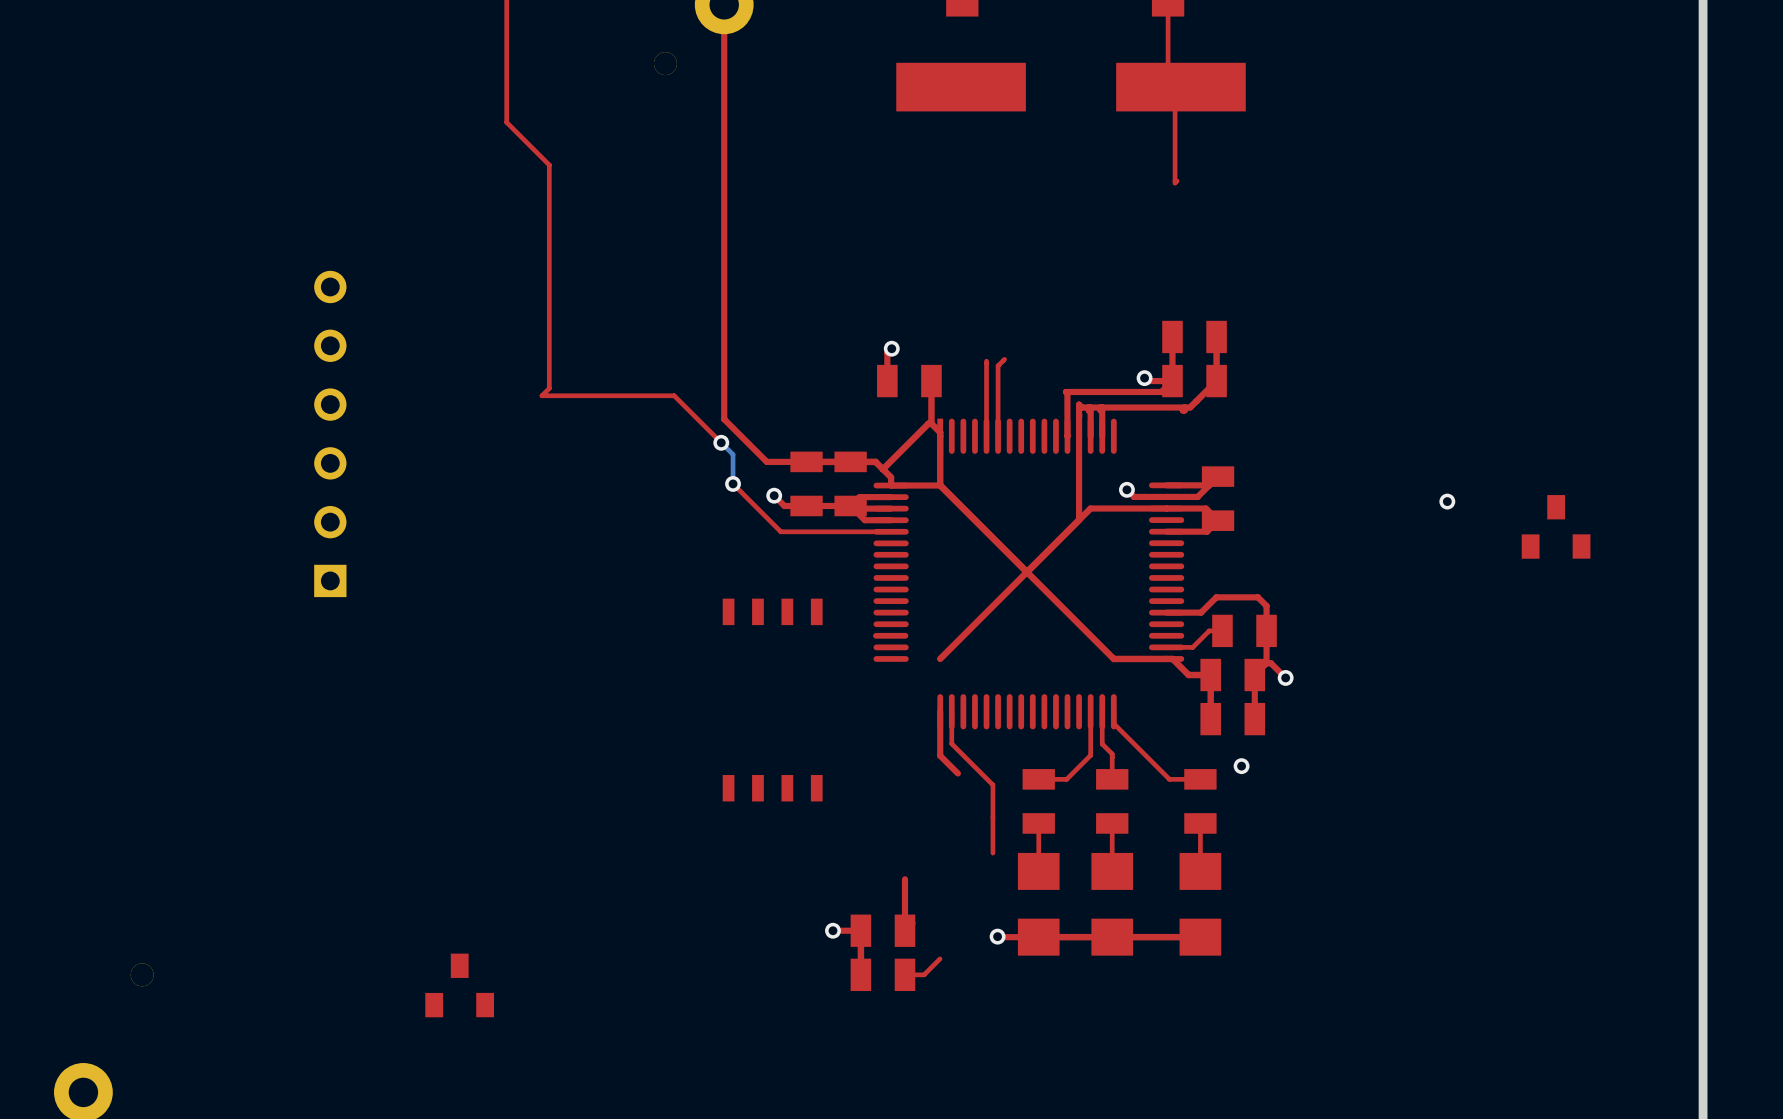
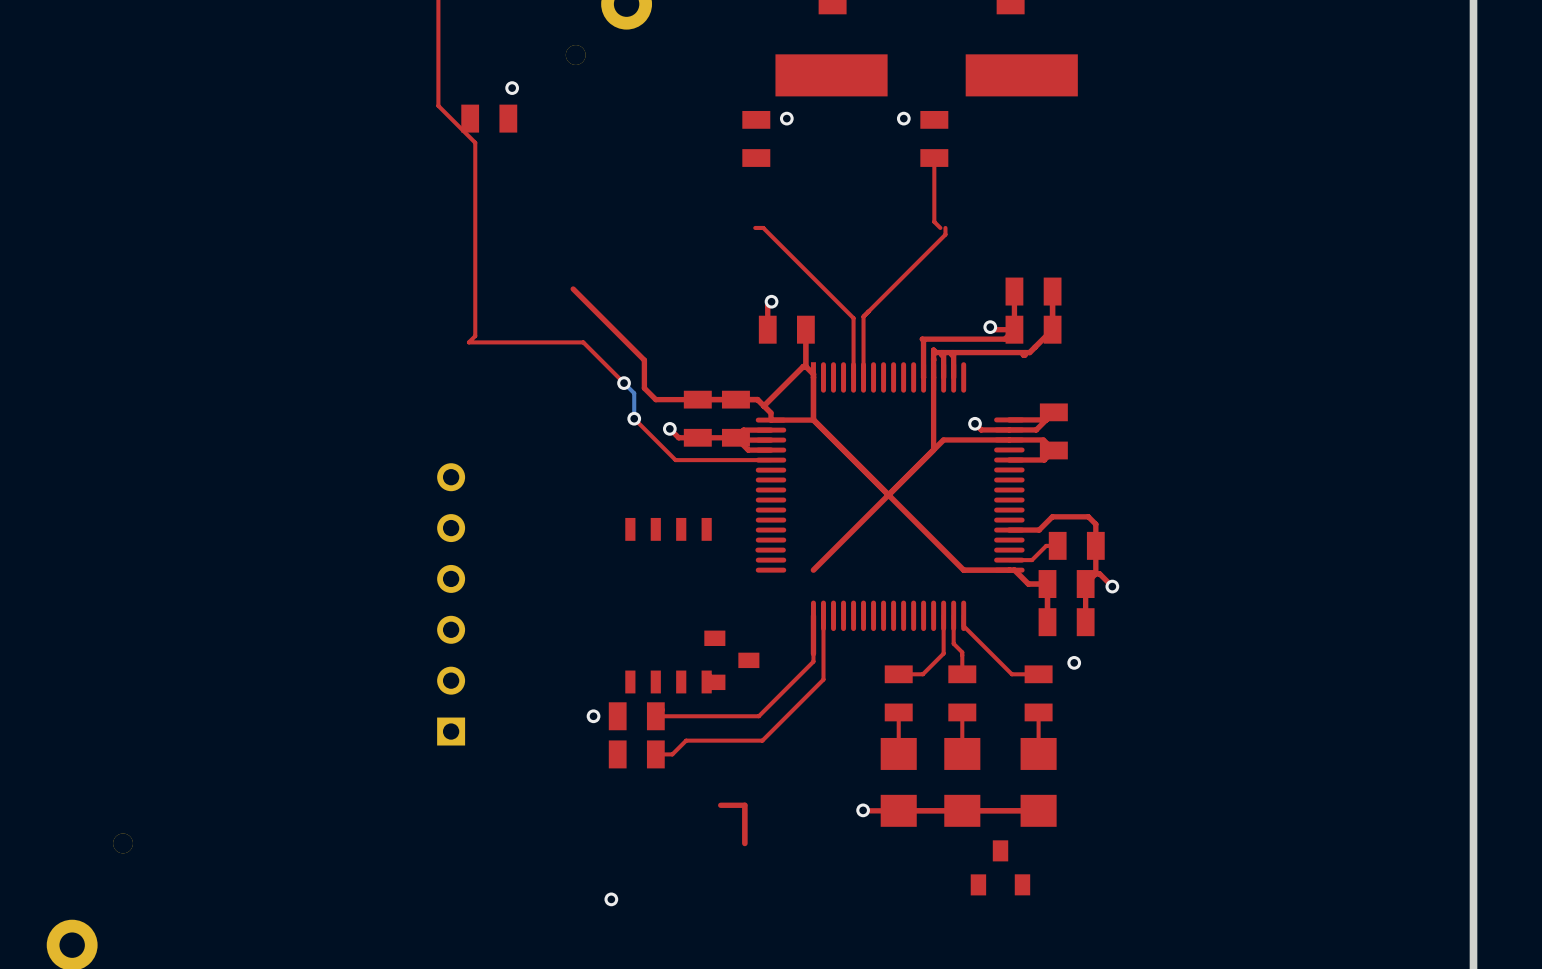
top track: (724, 4) (724, 419) (766, 461) -> (573, 289) (644, 360) (644, 388) (655, 399) (663, 399)
top track: (1168, 6) (1168, 80) (1175, 87) (1175, 182) (1176, 181) (1175, 181) -> none
via: none -> (512, 88)
part: none -> (489, 118)
via: none -> (786, 118)
via: none -> (903, 118)
part: none -> (756, 138)
part: none -> (934, 138)
top track: none -> (934, 158) (934, 221) (940, 227)
top track: none -> (945, 227) (945, 234) (869, 310)
top track: (986, 361) (986, 367) -> (755, 227) (763, 227) (853, 318)
part position: (330, 433) -> (451, 604)
via: (1447, 501) -> none
part: (1556, 526) -> none
top track: (951, 743) (992, 785) (992, 853) -> (823, 643) (823, 679) (762, 740) (686, 740) (672, 754) (655, 754)
top track: (940, 755) (957, 773) -> (813, 653) (813, 661) (758, 716) (655, 716) (662, 709)
part: none -> (731, 660)
via: none -> (593, 716)
part: none -> (636, 716)
part: none -> (636, 754)
top track: (905, 879) (905, 930) (912, 923) -> none
via: (832, 930) -> none
part: (882, 930) -> none
top track: (940, 958) (924, 974) (905, 974) -> none
part: (882, 974) -> none
part: (459, 985) -> none
part: none -> (1000, 867)
via: none -> (611, 899)

